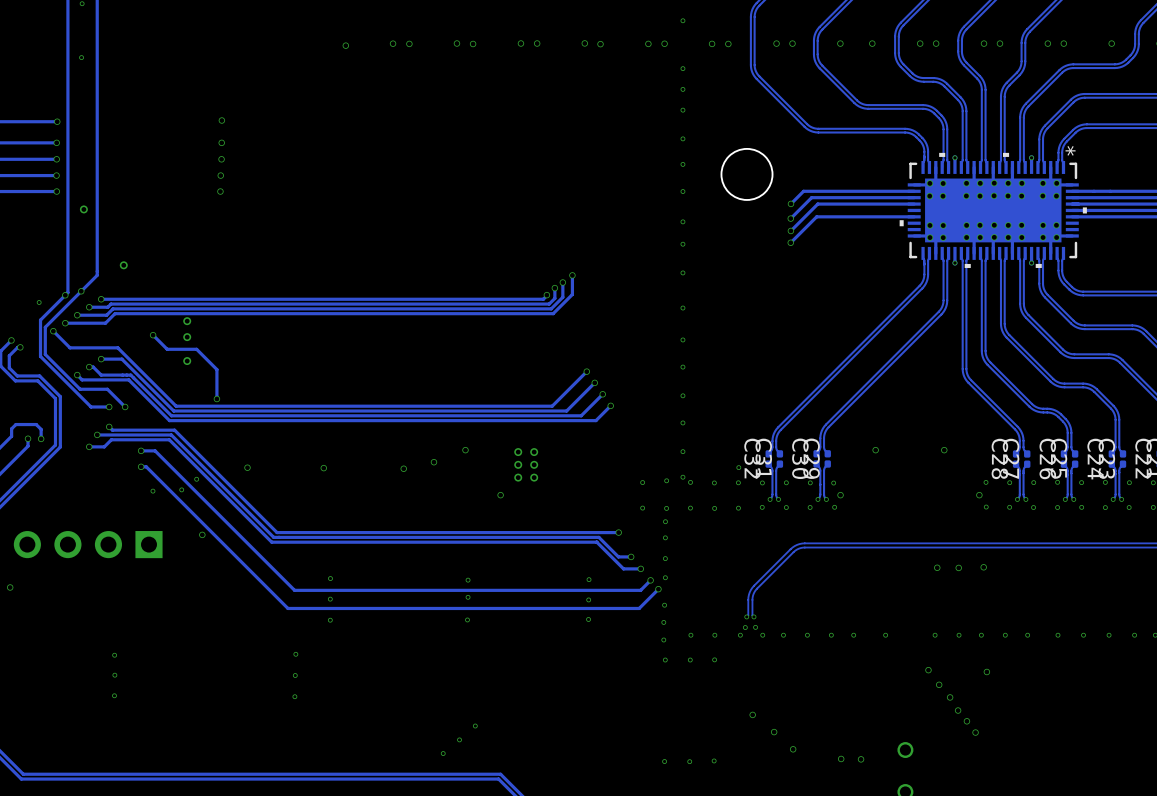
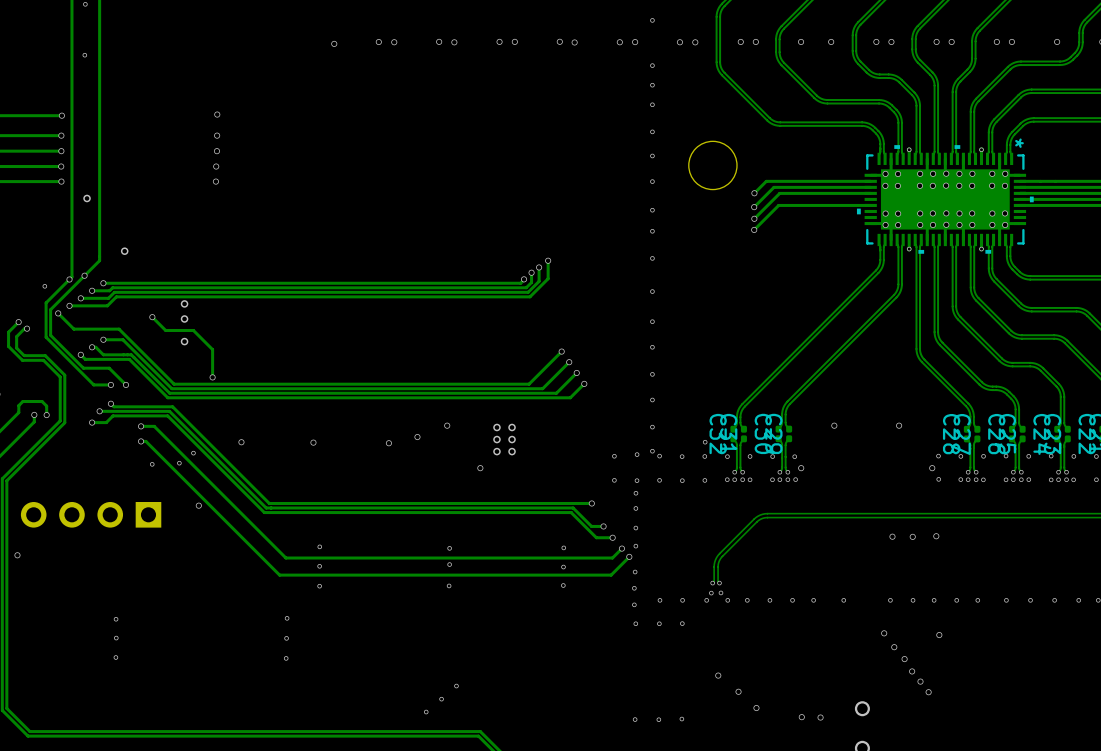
via: none -> (734, 479)
via: none -> (742, 479)
via: none -> (779, 479)
via: none -> (787, 479)
via: none -> (968, 479)
via: none -> (976, 479)
via: none -> (1013, 479)
via: none -> (1021, 479)
via: none -> (1058, 479)
via: none -> (1066, 479)

